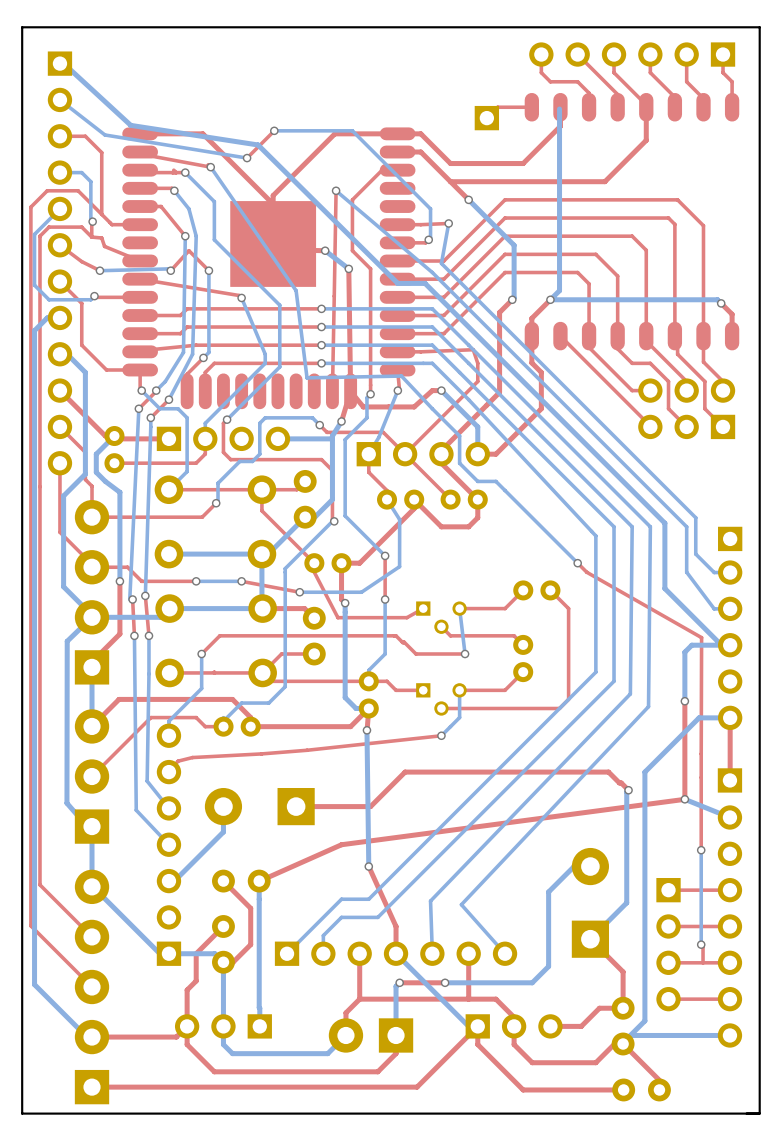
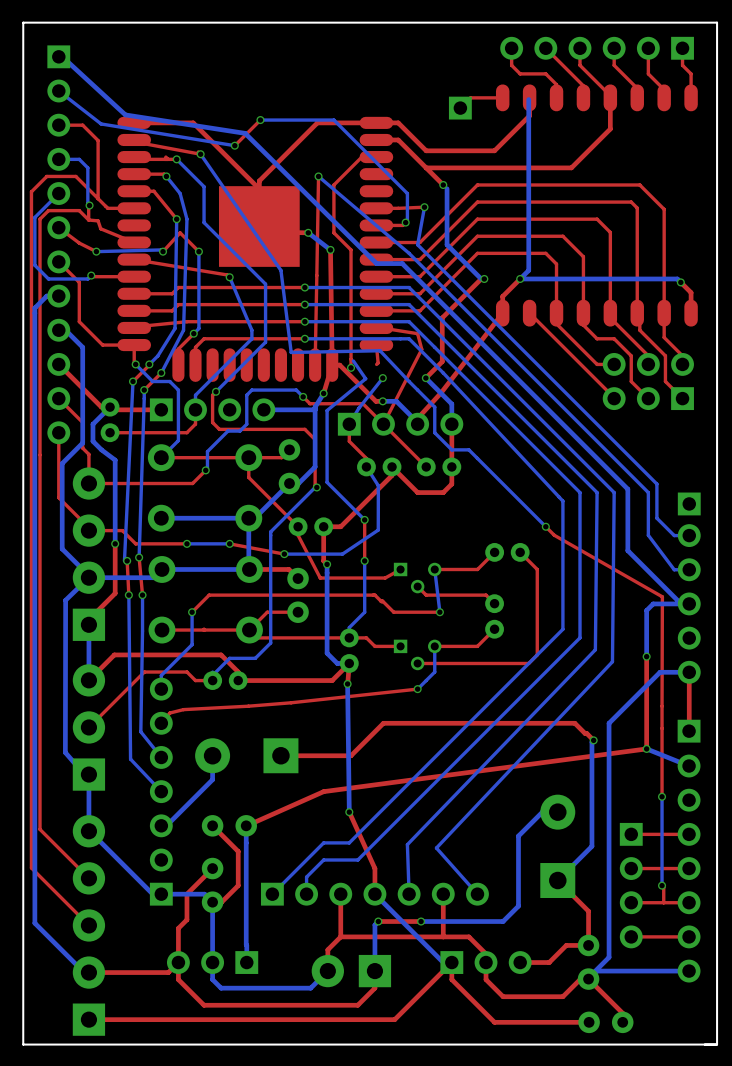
bottom track: (468, 199) (514, 245) (514, 297) (512, 299) -> none
bottom track: none -> (447, 188) (447, 244) (481, 278)
top track: none -> (481, 278) (442, 317) (442, 361) (425, 378)
top track: (512, 299) (499, 312) (499, 392) (441, 450) -> none
top track: (531, 336) (531, 362) (541, 372) (541, 408) (495, 454) (477, 454) -> (502, 313) (440, 393) (417, 418)
top track: (397, 351) (473, 349) (477, 363) (477, 381) (405, 454) -> (376, 327) (417, 333) (421, 349) (383, 424)
bottom track: (397, 390) (378, 437) -> (382, 378) (358, 408)
via position: (397, 390) -> (382, 378)
bottom track: (441, 390) (477, 426) (477, 432) -> (425, 378) (451, 404)
top track: (441, 390) (432, 390) (414, 406) (363, 406) (350, 391) -> (382, 401) (375, 401) (339, 365) (332, 365)
via position: (441, 390) -> (425, 378)
bottom track: (370, 394) (366, 397) (366, 417) (345, 439) -> (353, 361) (365, 378) (327, 410)
bottom track: none -> (382, 401) (396, 401) (417, 424)
via: none -> (382, 401)
top track: (441, 463) (477, 499) -> (451, 424) (451, 466)

